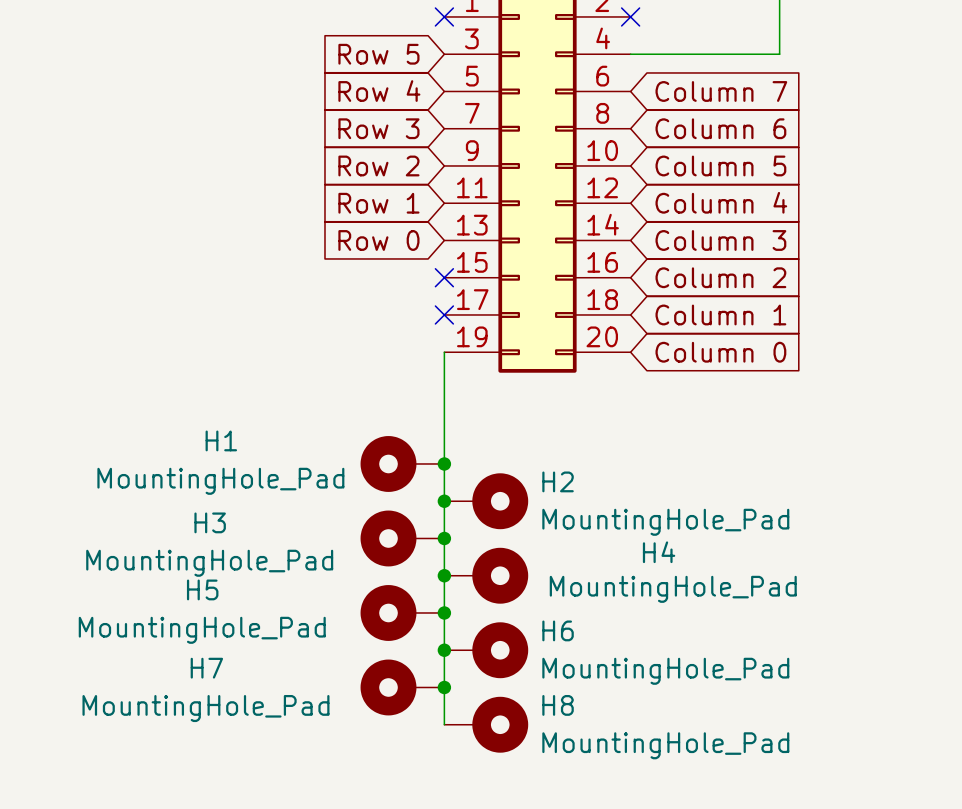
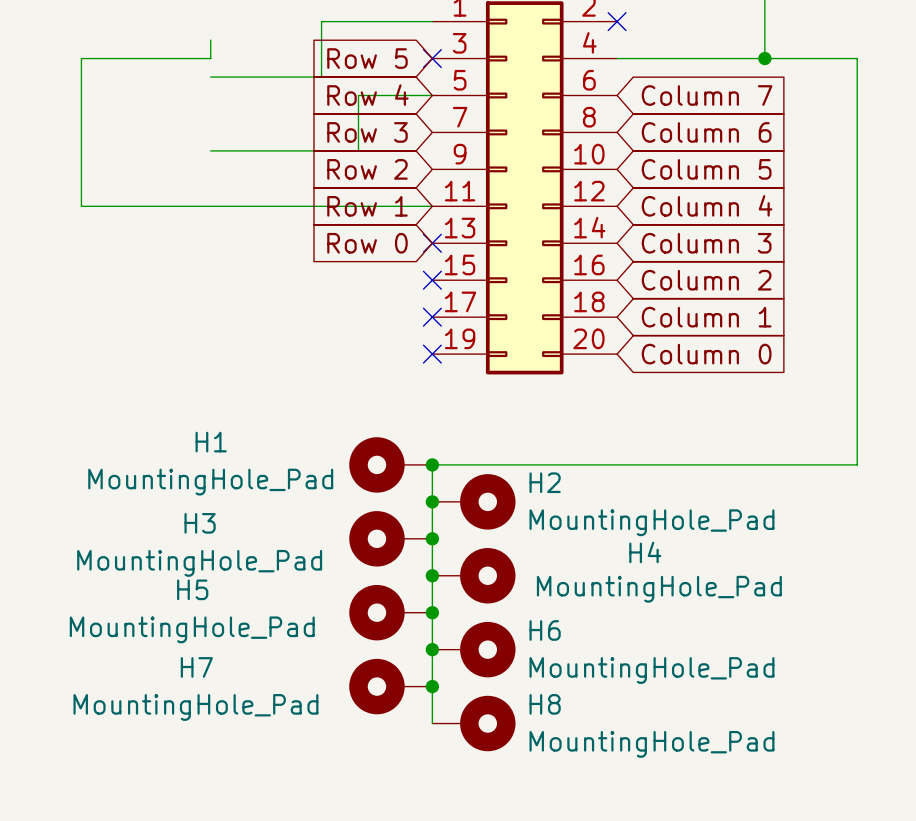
wire: none -> (432, 21) (321, 21) (321, 77) (210, 77)
no-connect mark position: (444, 16) -> (432, 58)
wire: none -> (210, 40) (210, 58) (81, 58) (81, 206) (432, 206)
junction: none -> (764, 58)
wire: none -> (432, 95) (358, 95) (358, 150) (210, 150)
no-connect mark: none -> (432, 243)
wire: (444, 352) (444, 463) -> (764, 58) (857, 58) (857, 464) (432, 464)
no-connect mark: none -> (432, 354)

